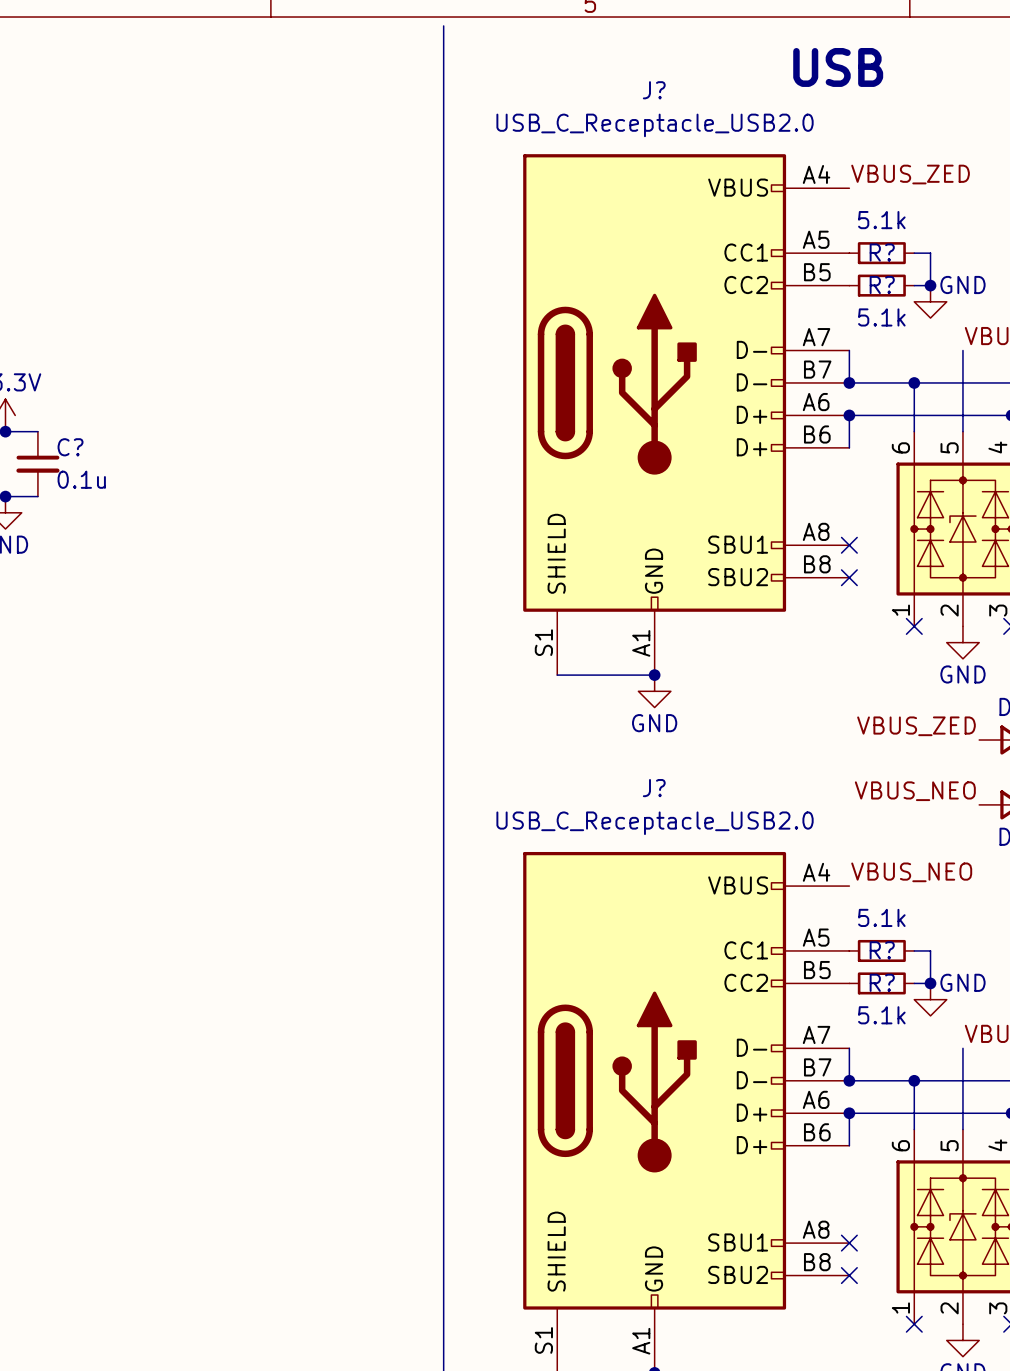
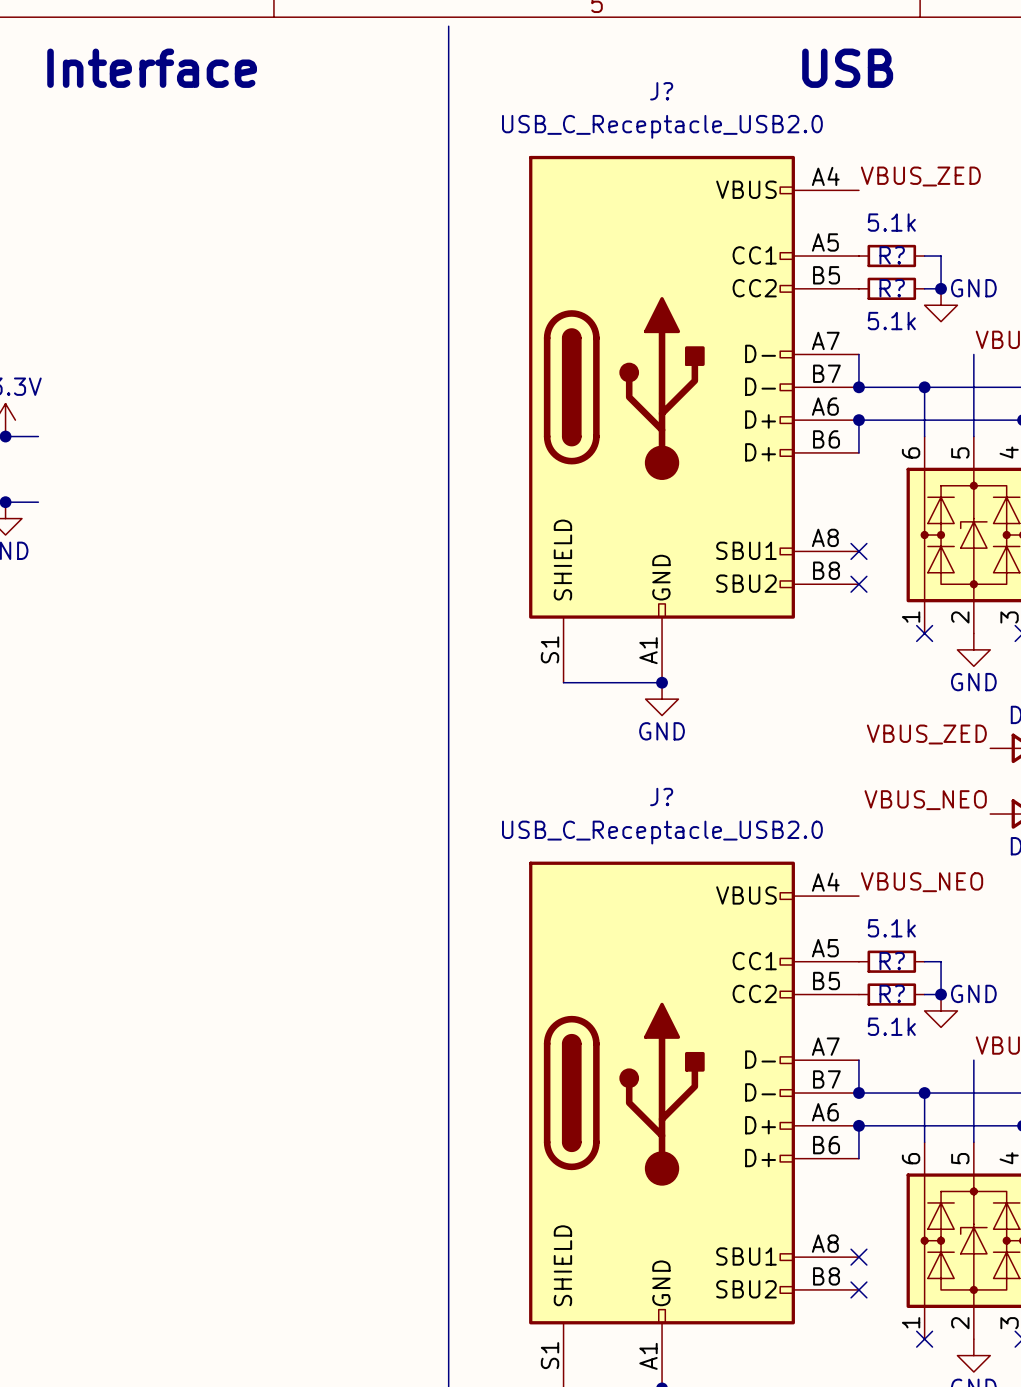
text: none -> Interface (152, 68)
C?: 0.1u (37, 464) -> none

